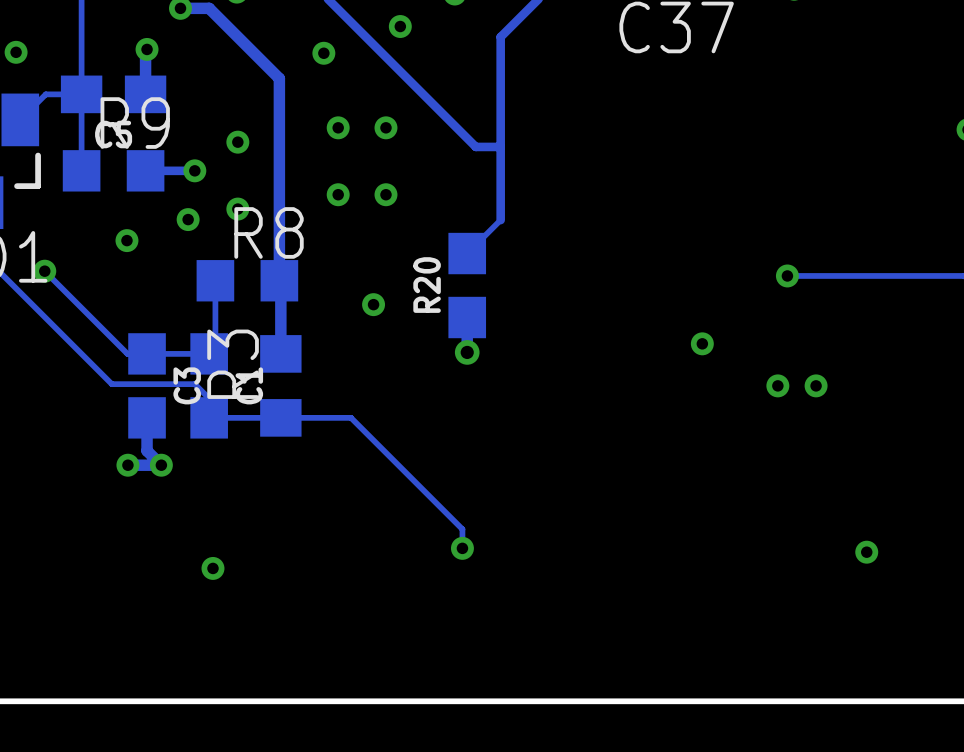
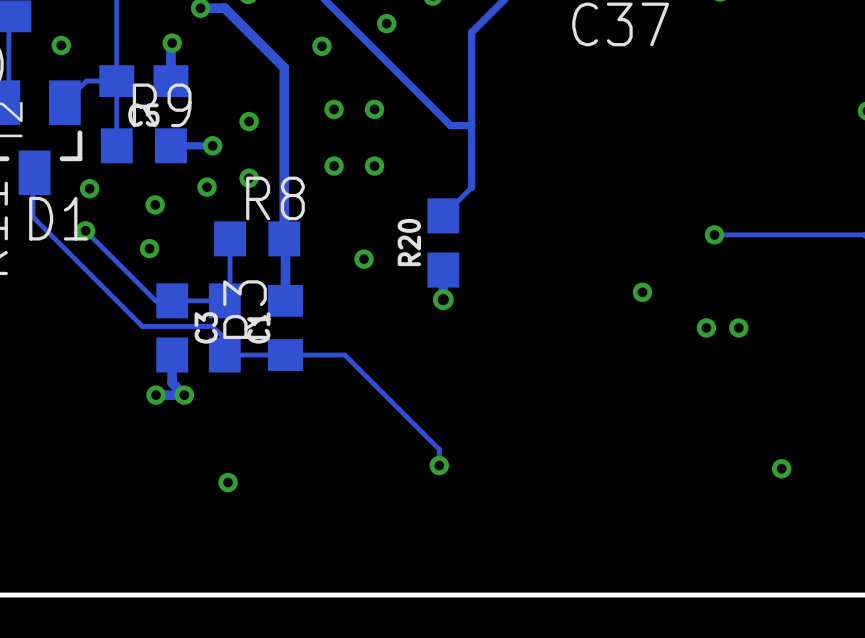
via: none -> (89, 188)
via: none -> (149, 248)

